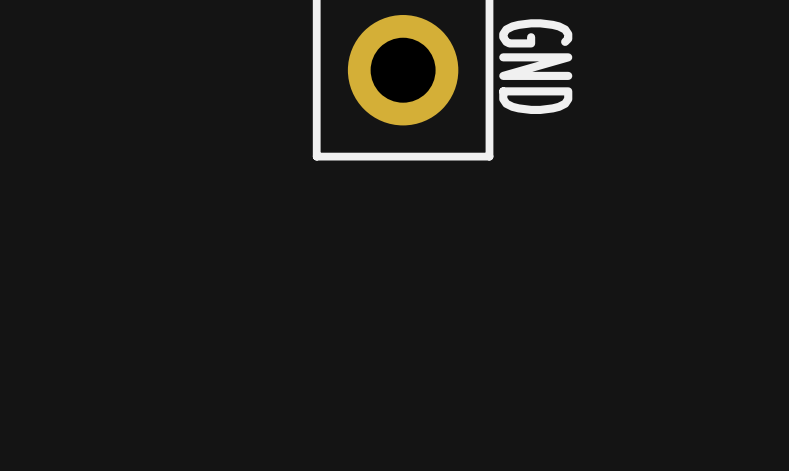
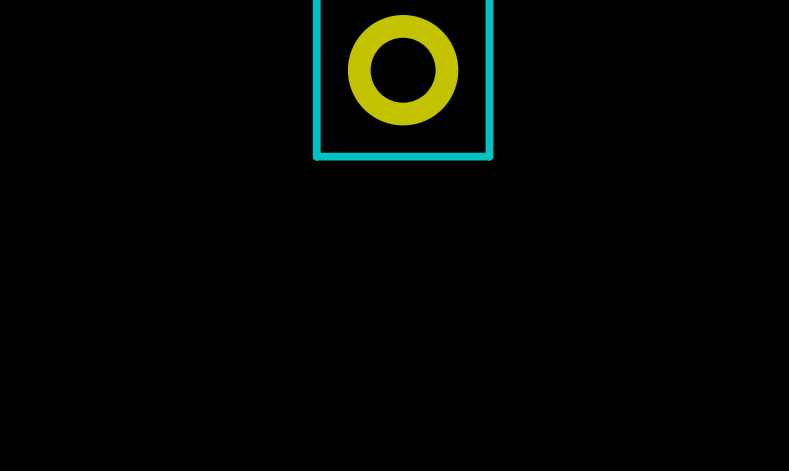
text: GND (535, 66) -> none

